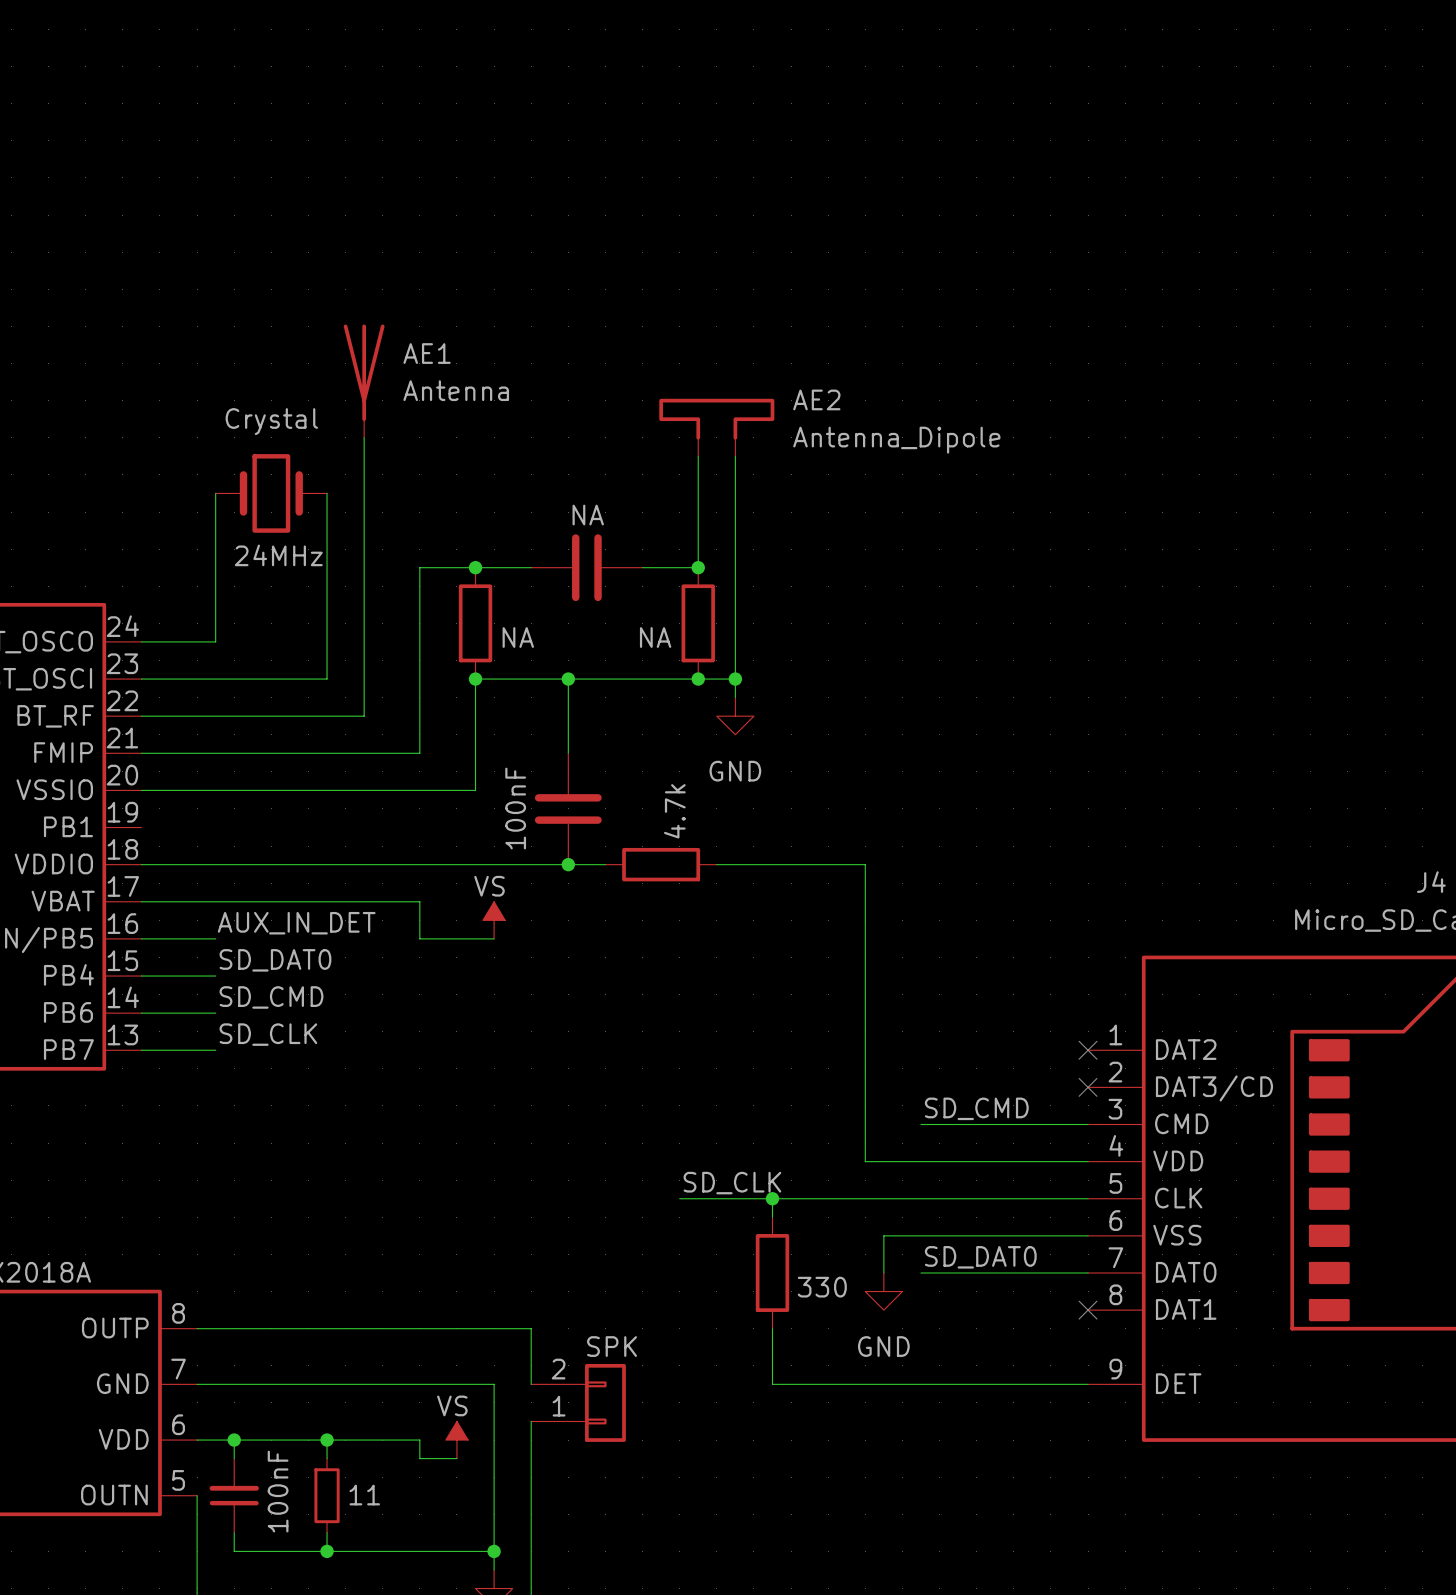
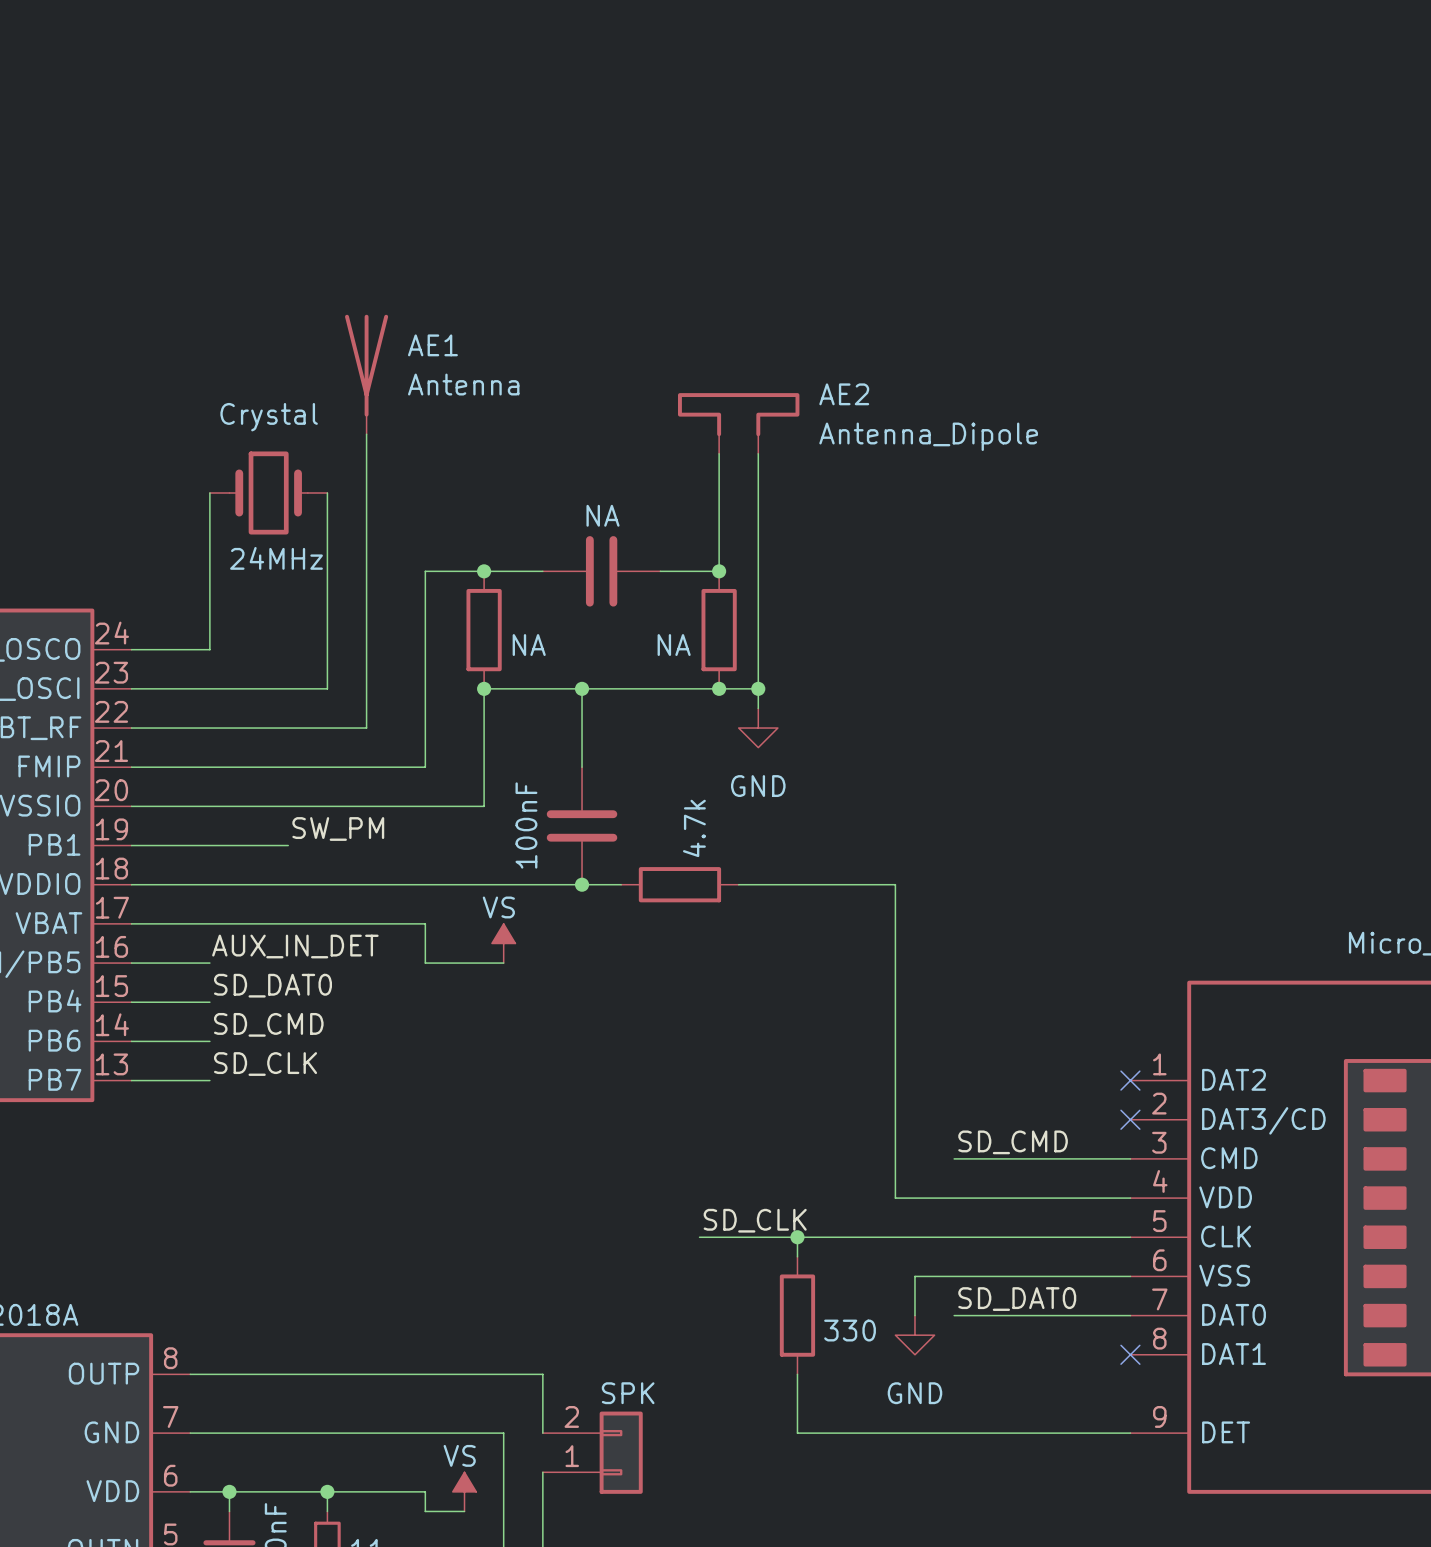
label: none -> SW_PM (338, 828)
wire: none -> (131, 845) (288, 845)

